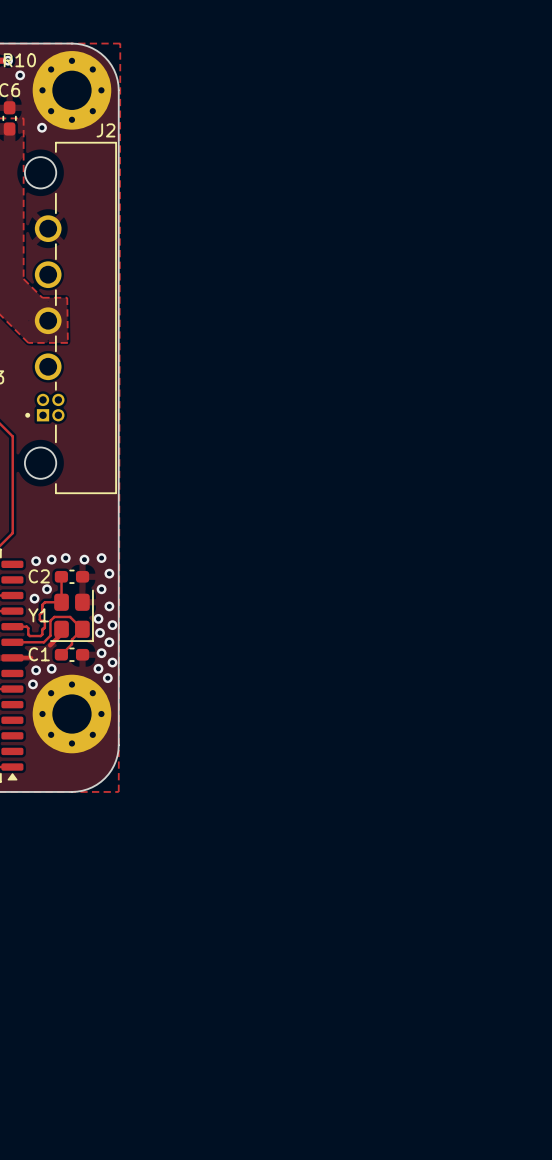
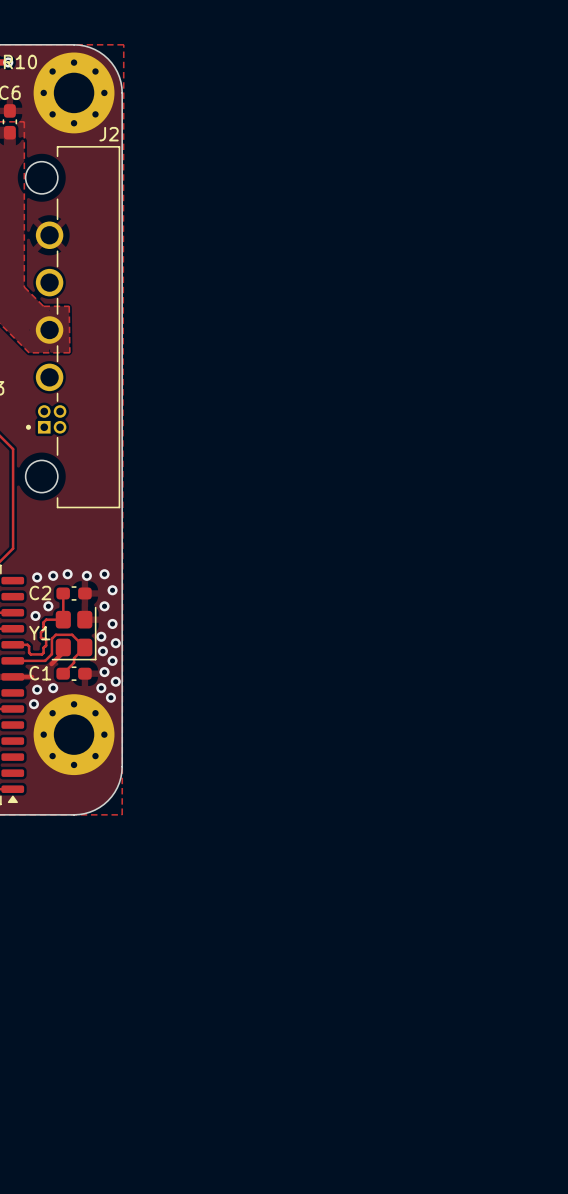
via: (20, 75) -> none
via: (42, 127) -> none

